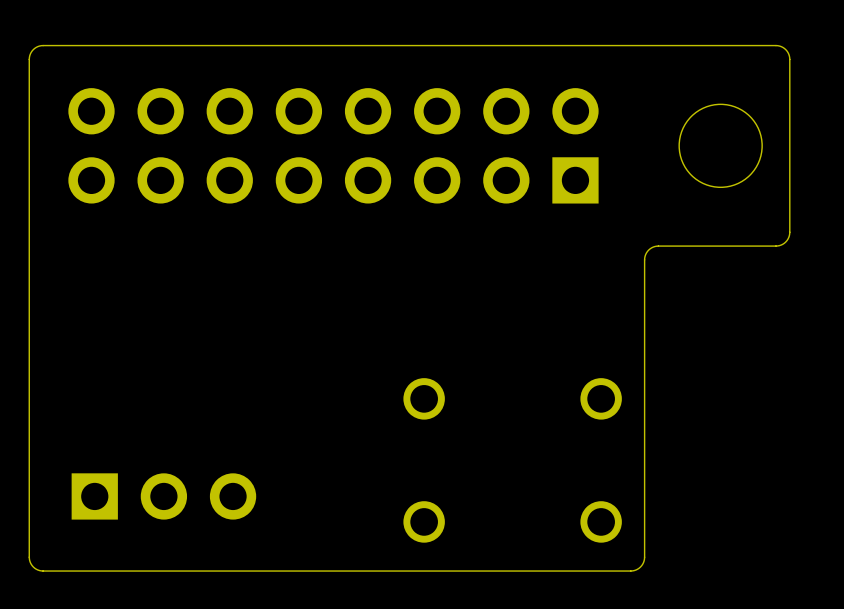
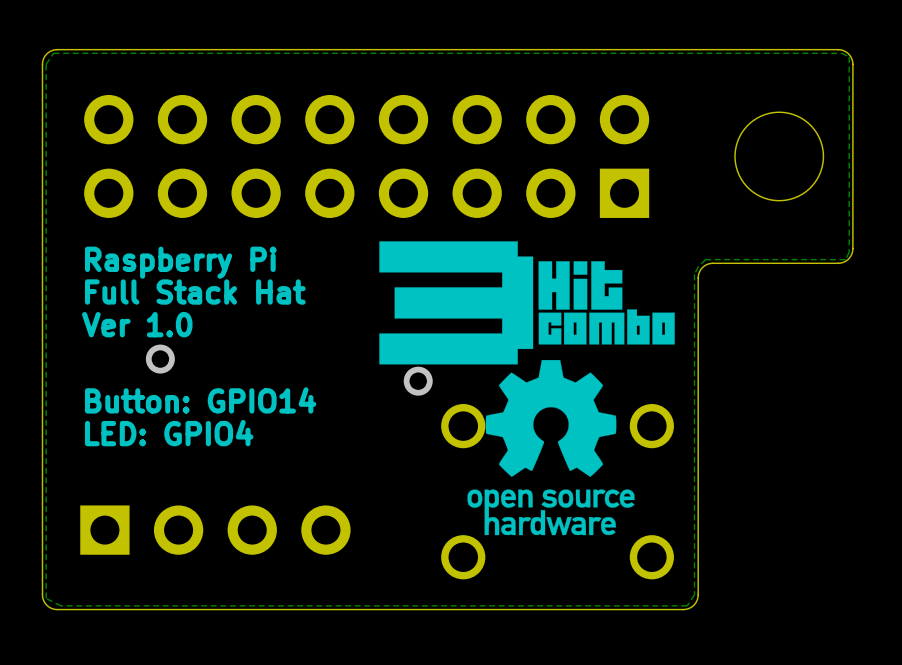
zone outline: none -> (841, 53) (53, 53) (46, 64) (46, 598) (60, 605) (687, 605) (694, 594) (694, 274) (705, 259) (845, 259) (849, 252) (849, 57) (841, 53)
drawing: none -> [379, 241, 675, 536]
text: none -> Raspberry Pi (180, 262)
text: none -> Full Stack Hat (195, 292)
text: none -> Ver 1.0 (137, 324)
via: none -> (160, 359)
via: none -> (418, 381)
text: none -> Button: GPIO14 (200, 400)
text: none -> LED: GPIO4 (169, 433)
part: (163, 496) -> none
part: none -> (215, 530)

